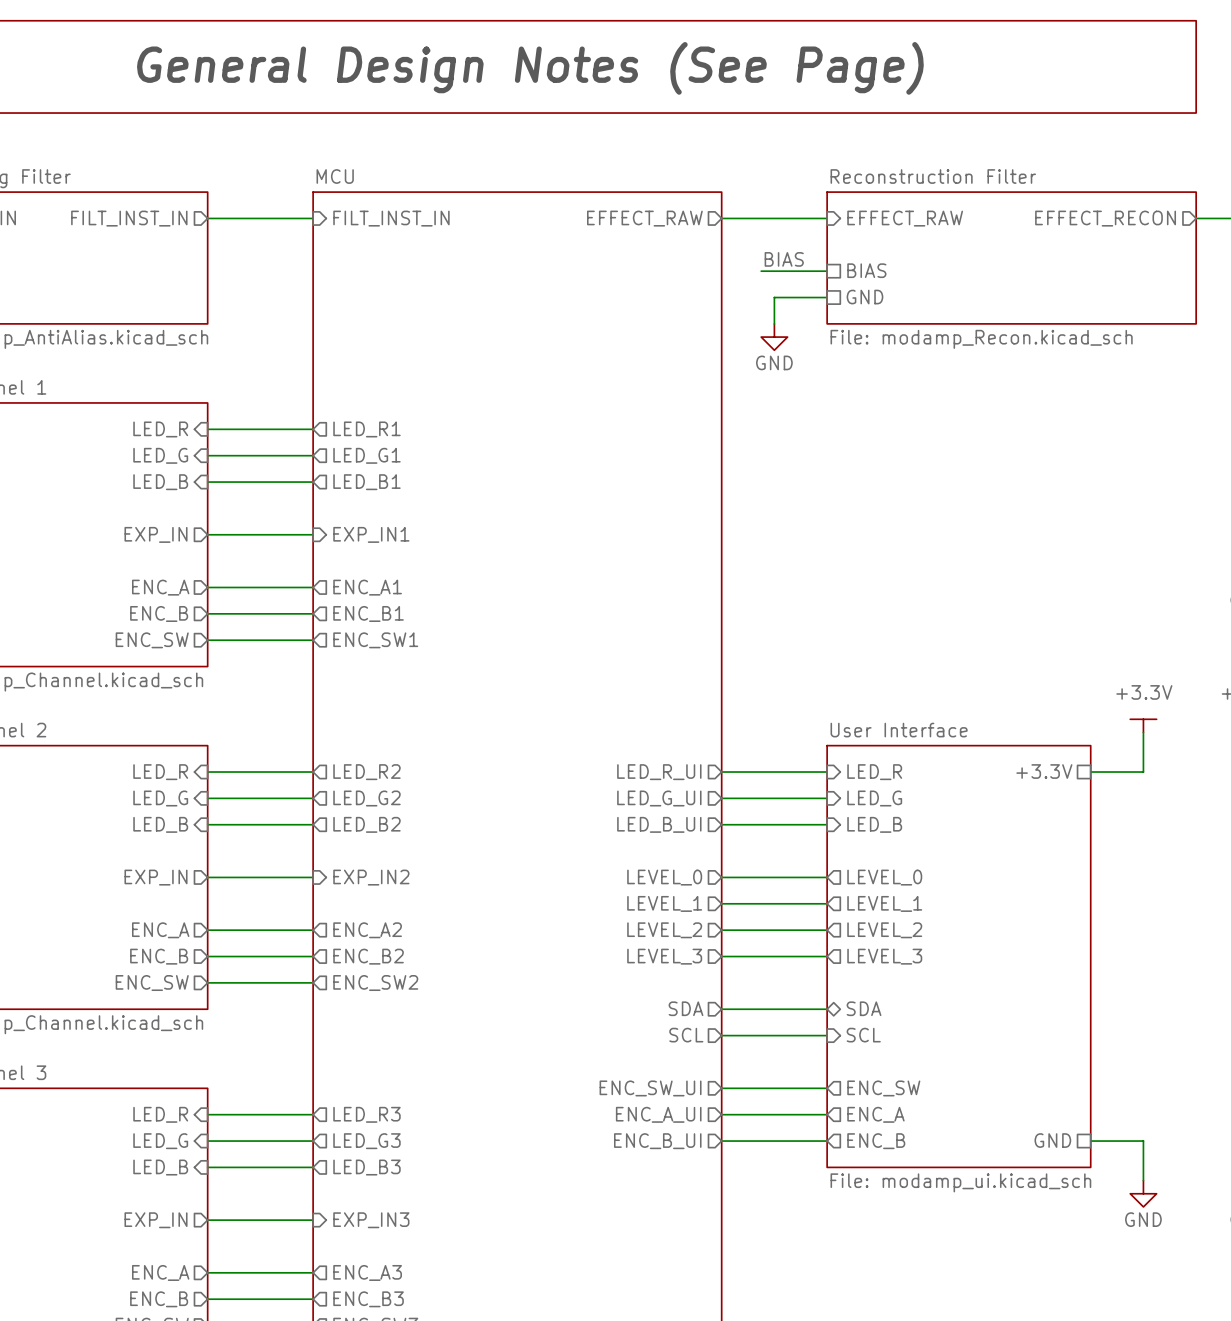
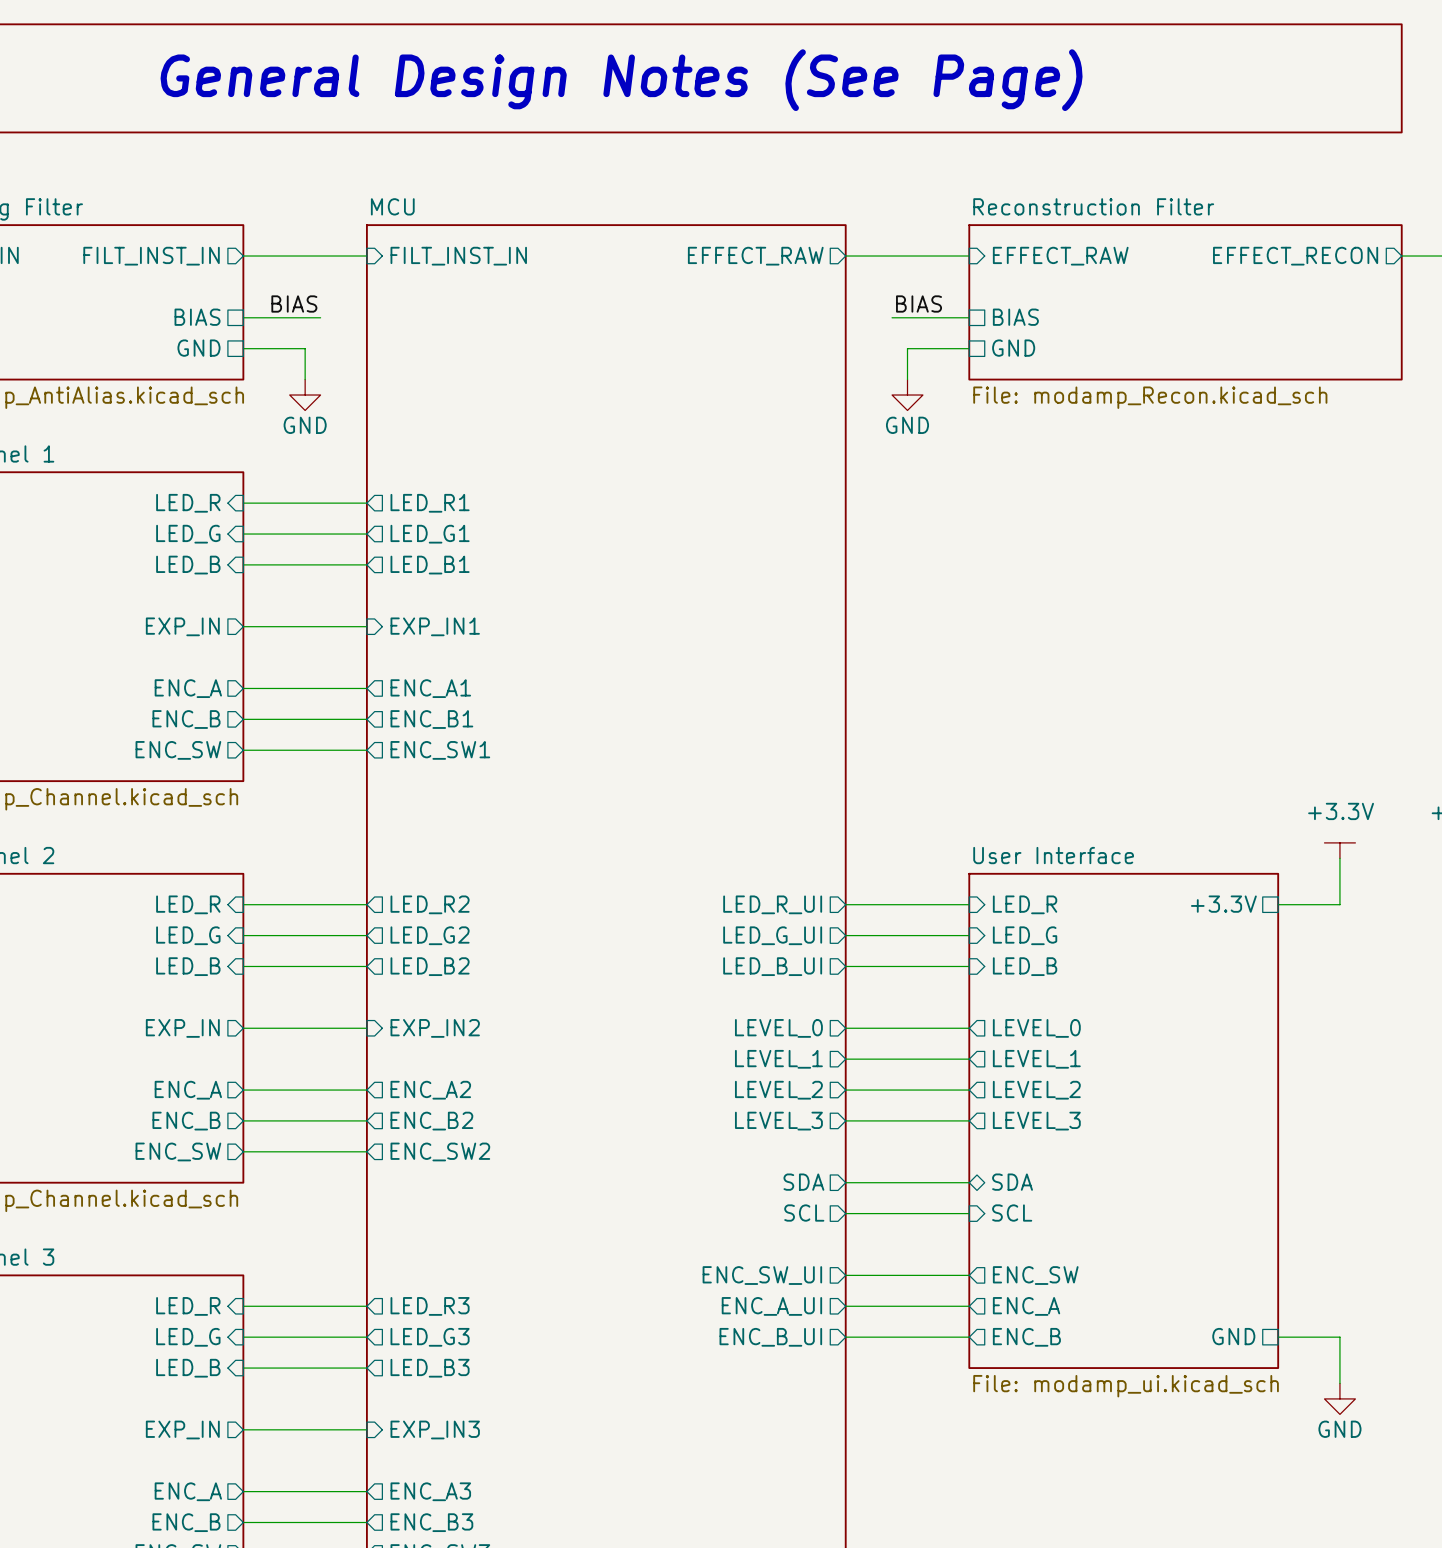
label: none -> BIAS (294, 304)
sheet pin: none -> BIAS (197, 317)
wire: none -> (243, 317) (320, 317)
sheet pin: none -> GND (198, 348)
wire: none -> (243, 348) (305, 348) (305, 379)
power symbol: none -> GND (305, 395)

